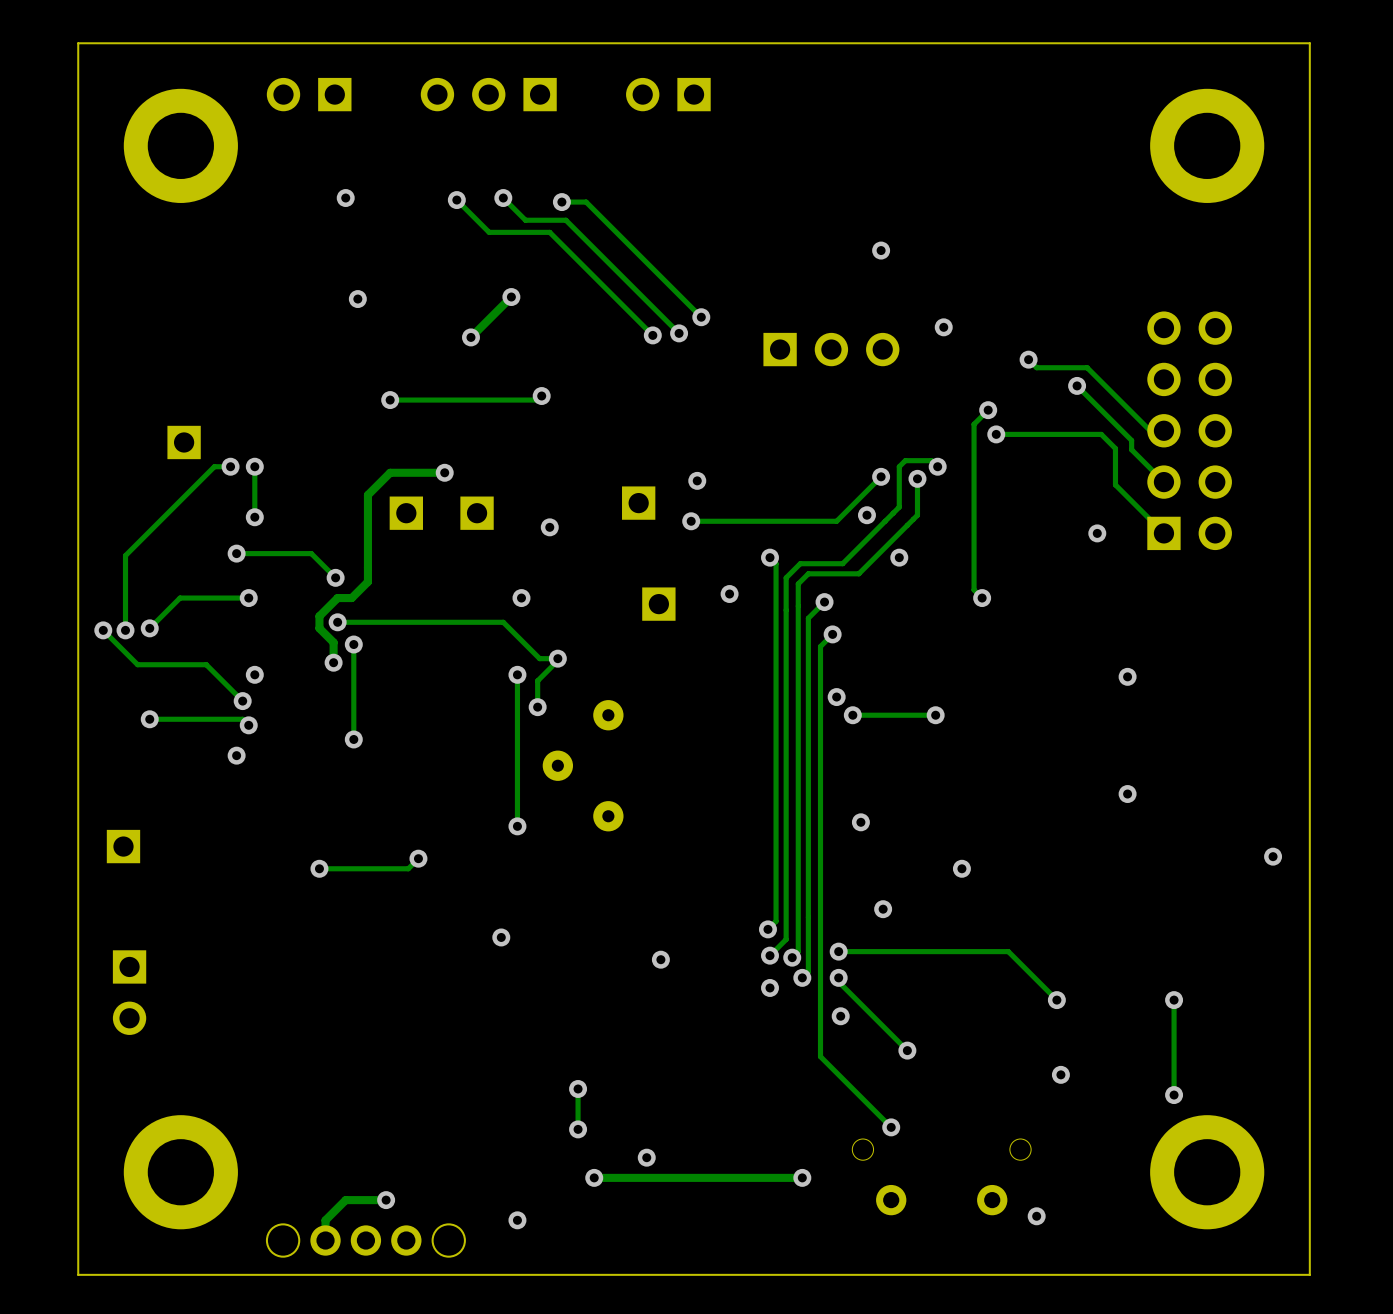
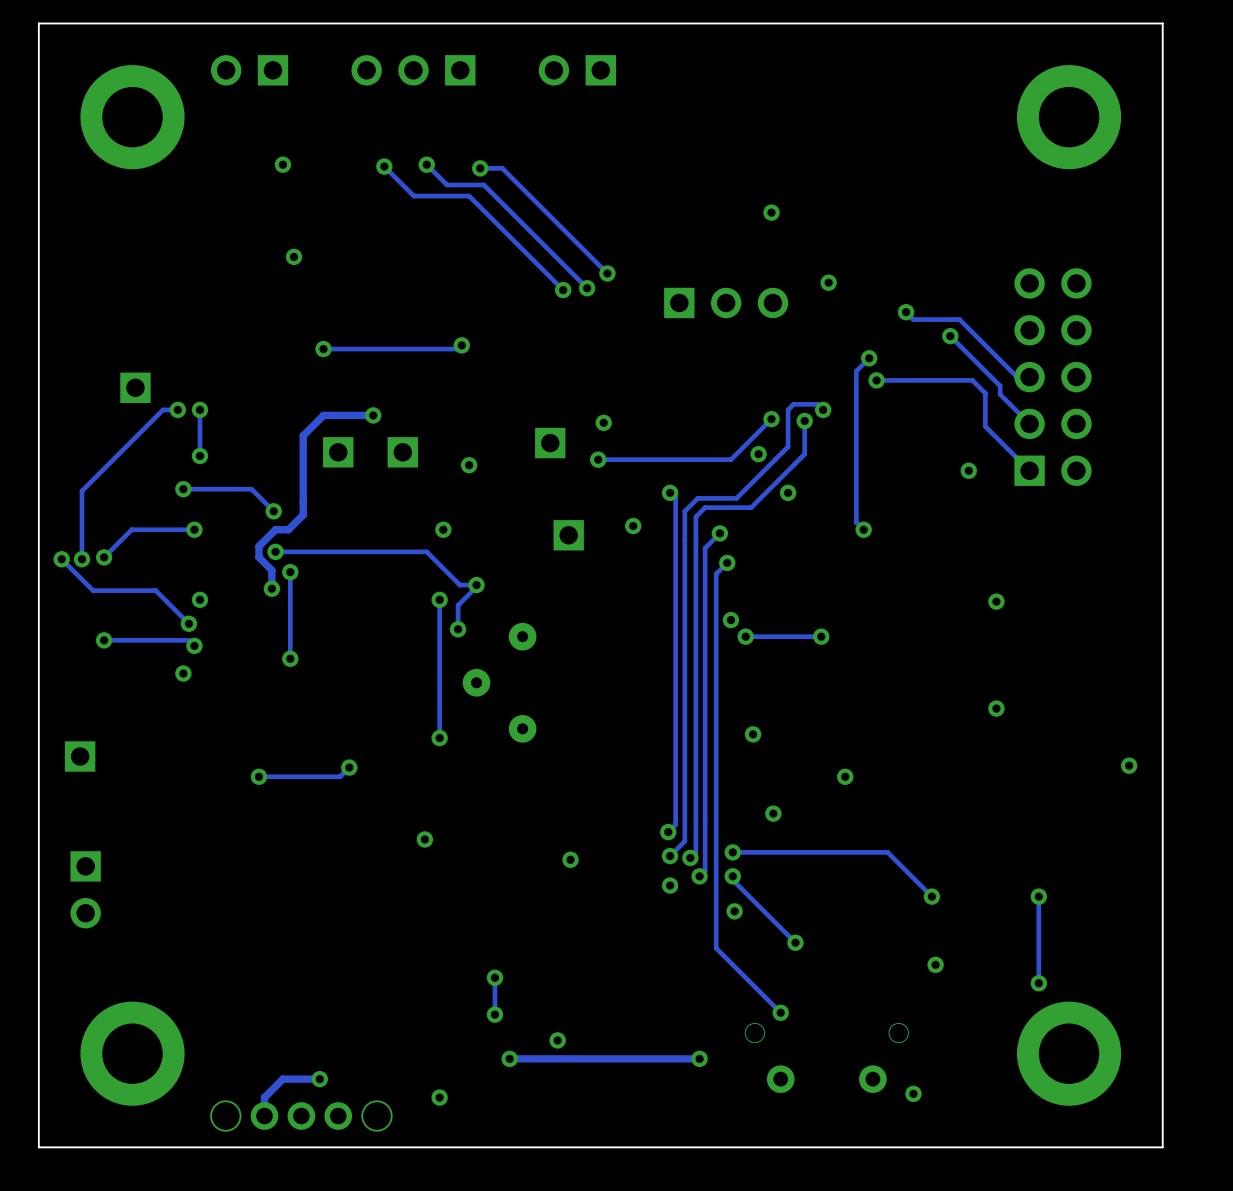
track: (511, 297) (470, 337) -> none
via: (511, 297) -> none
via: (470, 337) -> none

